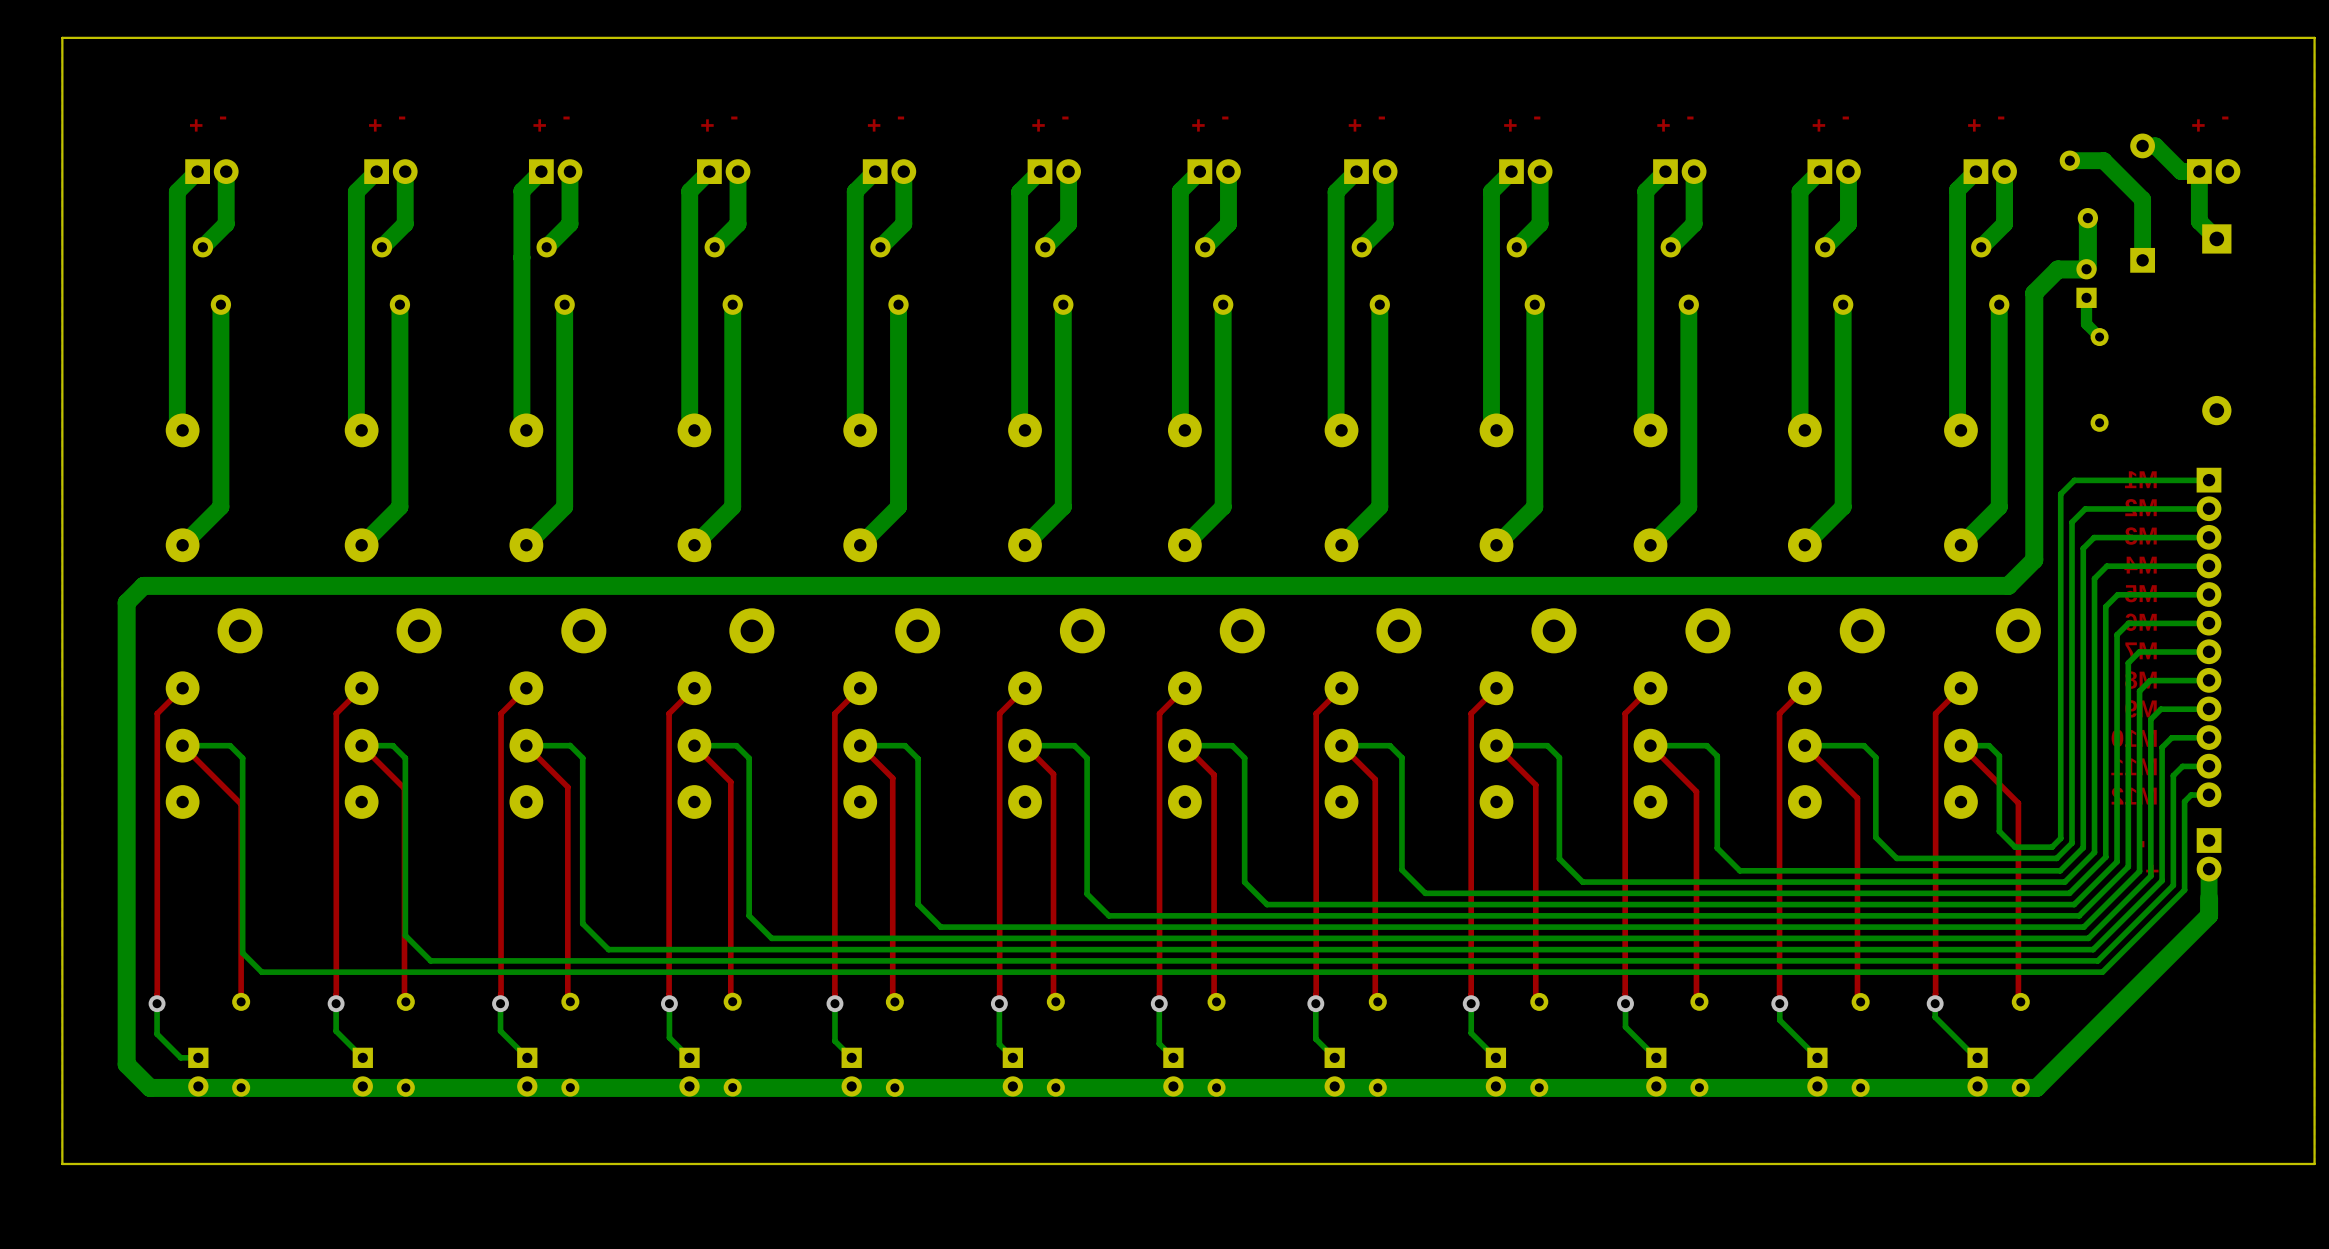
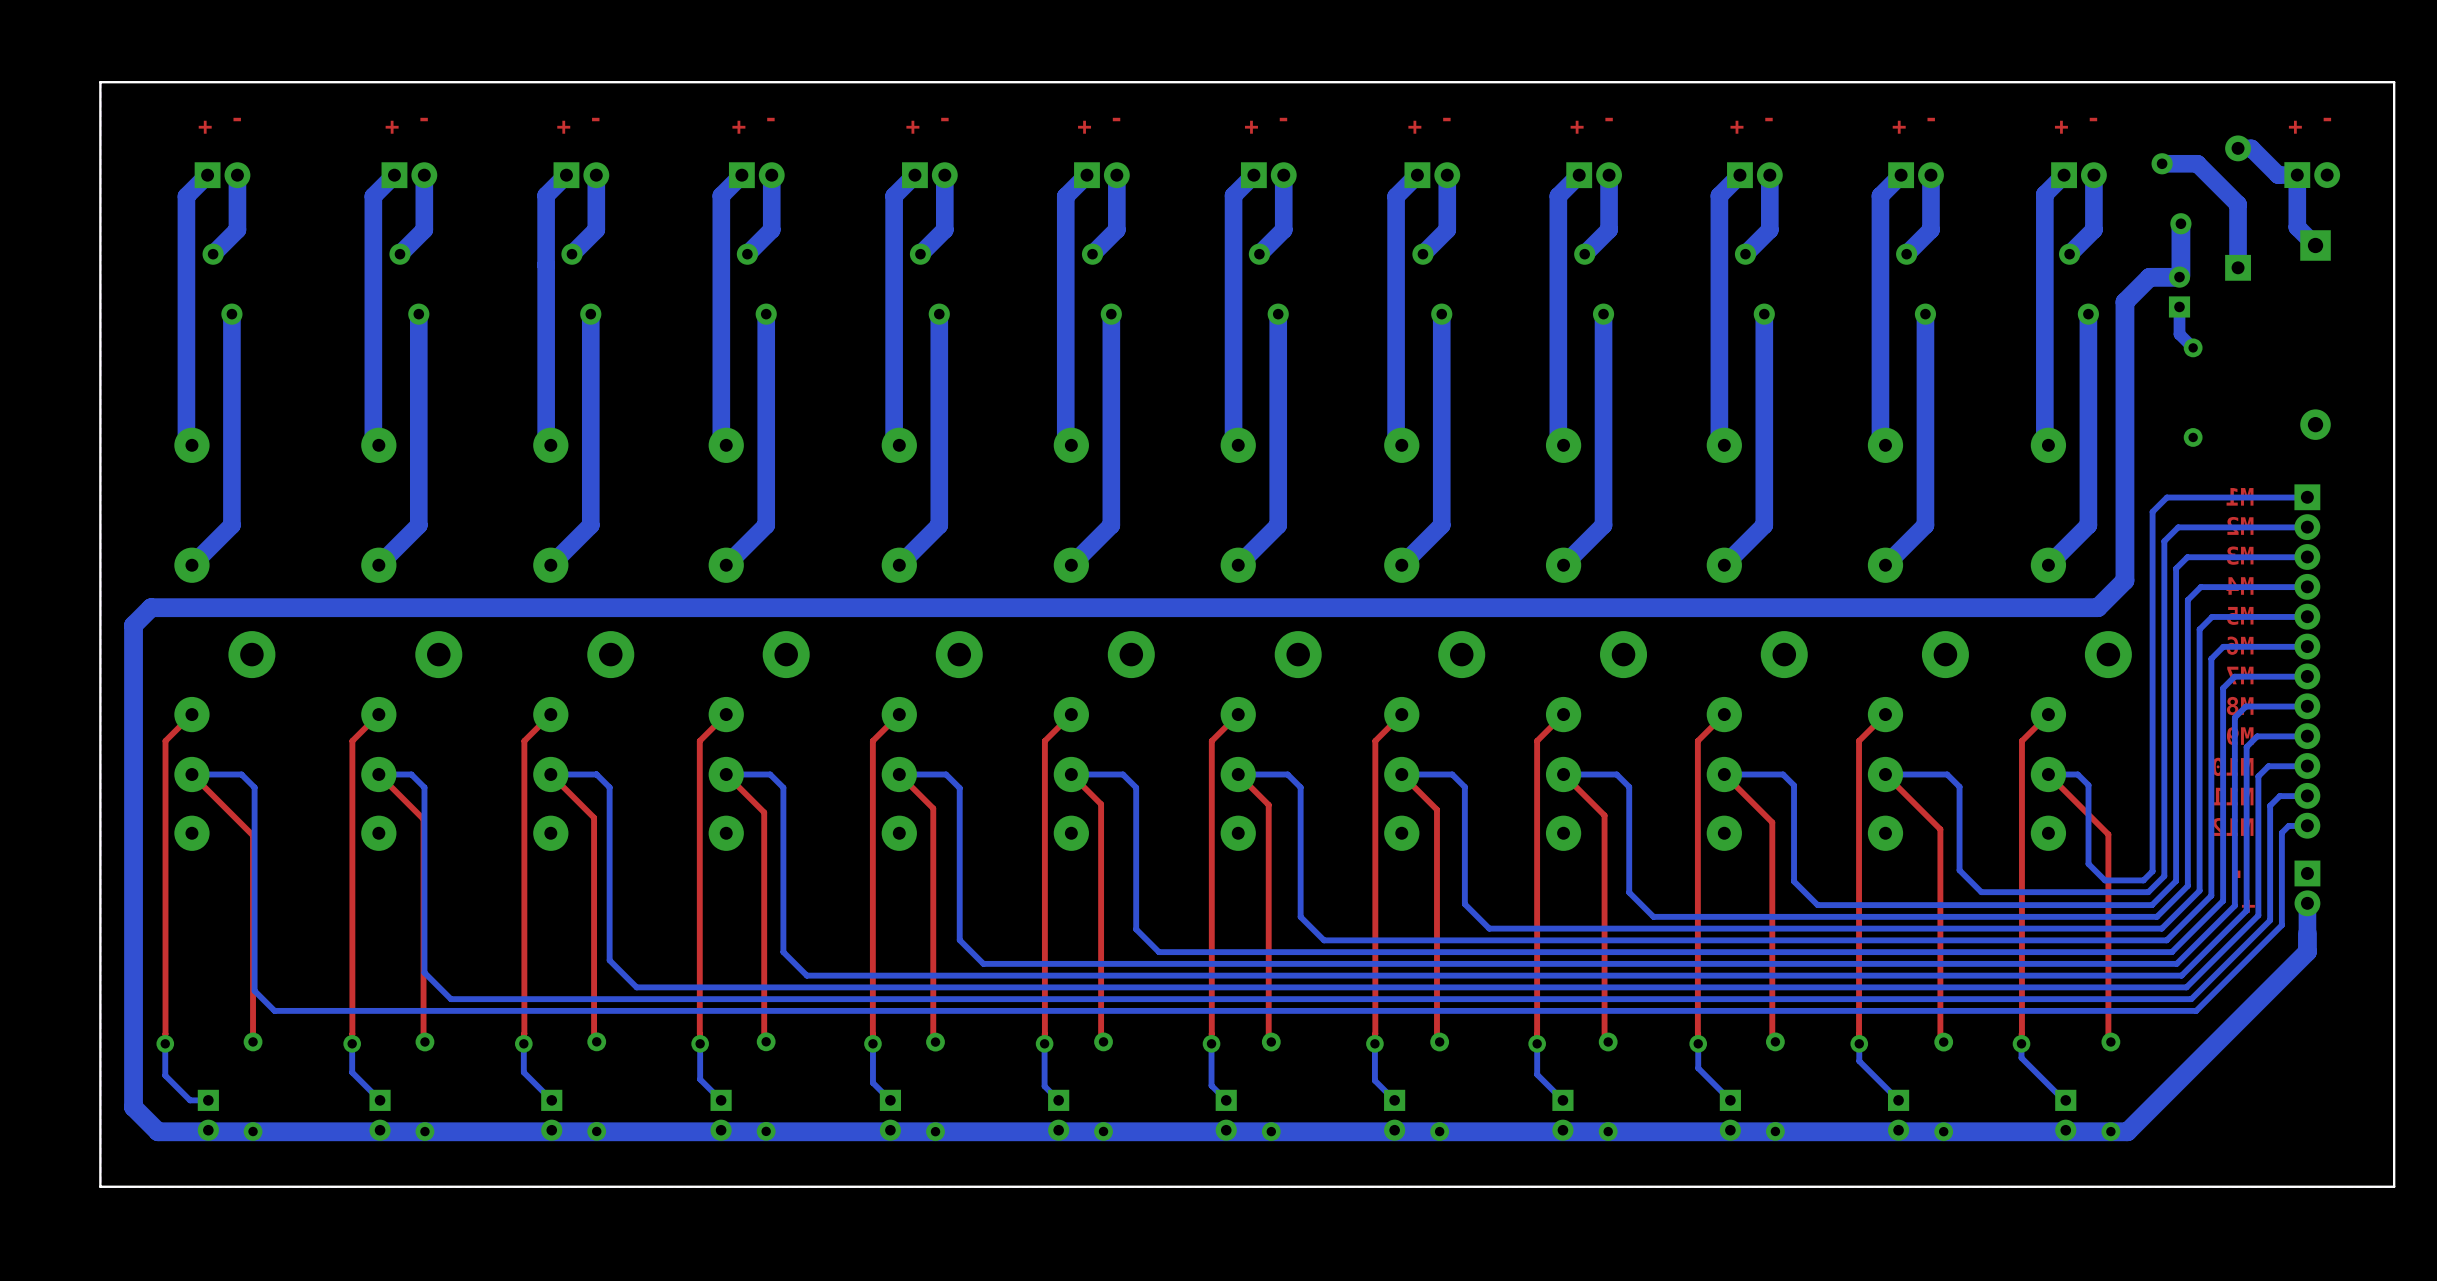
board edge: (2314, 37) (62, 37) (62, 1163) (2314, 1163) (2314, 37) -> (2394, 82) (2394, 1186) (100, 1186) (100, 82) (2394, 82)

